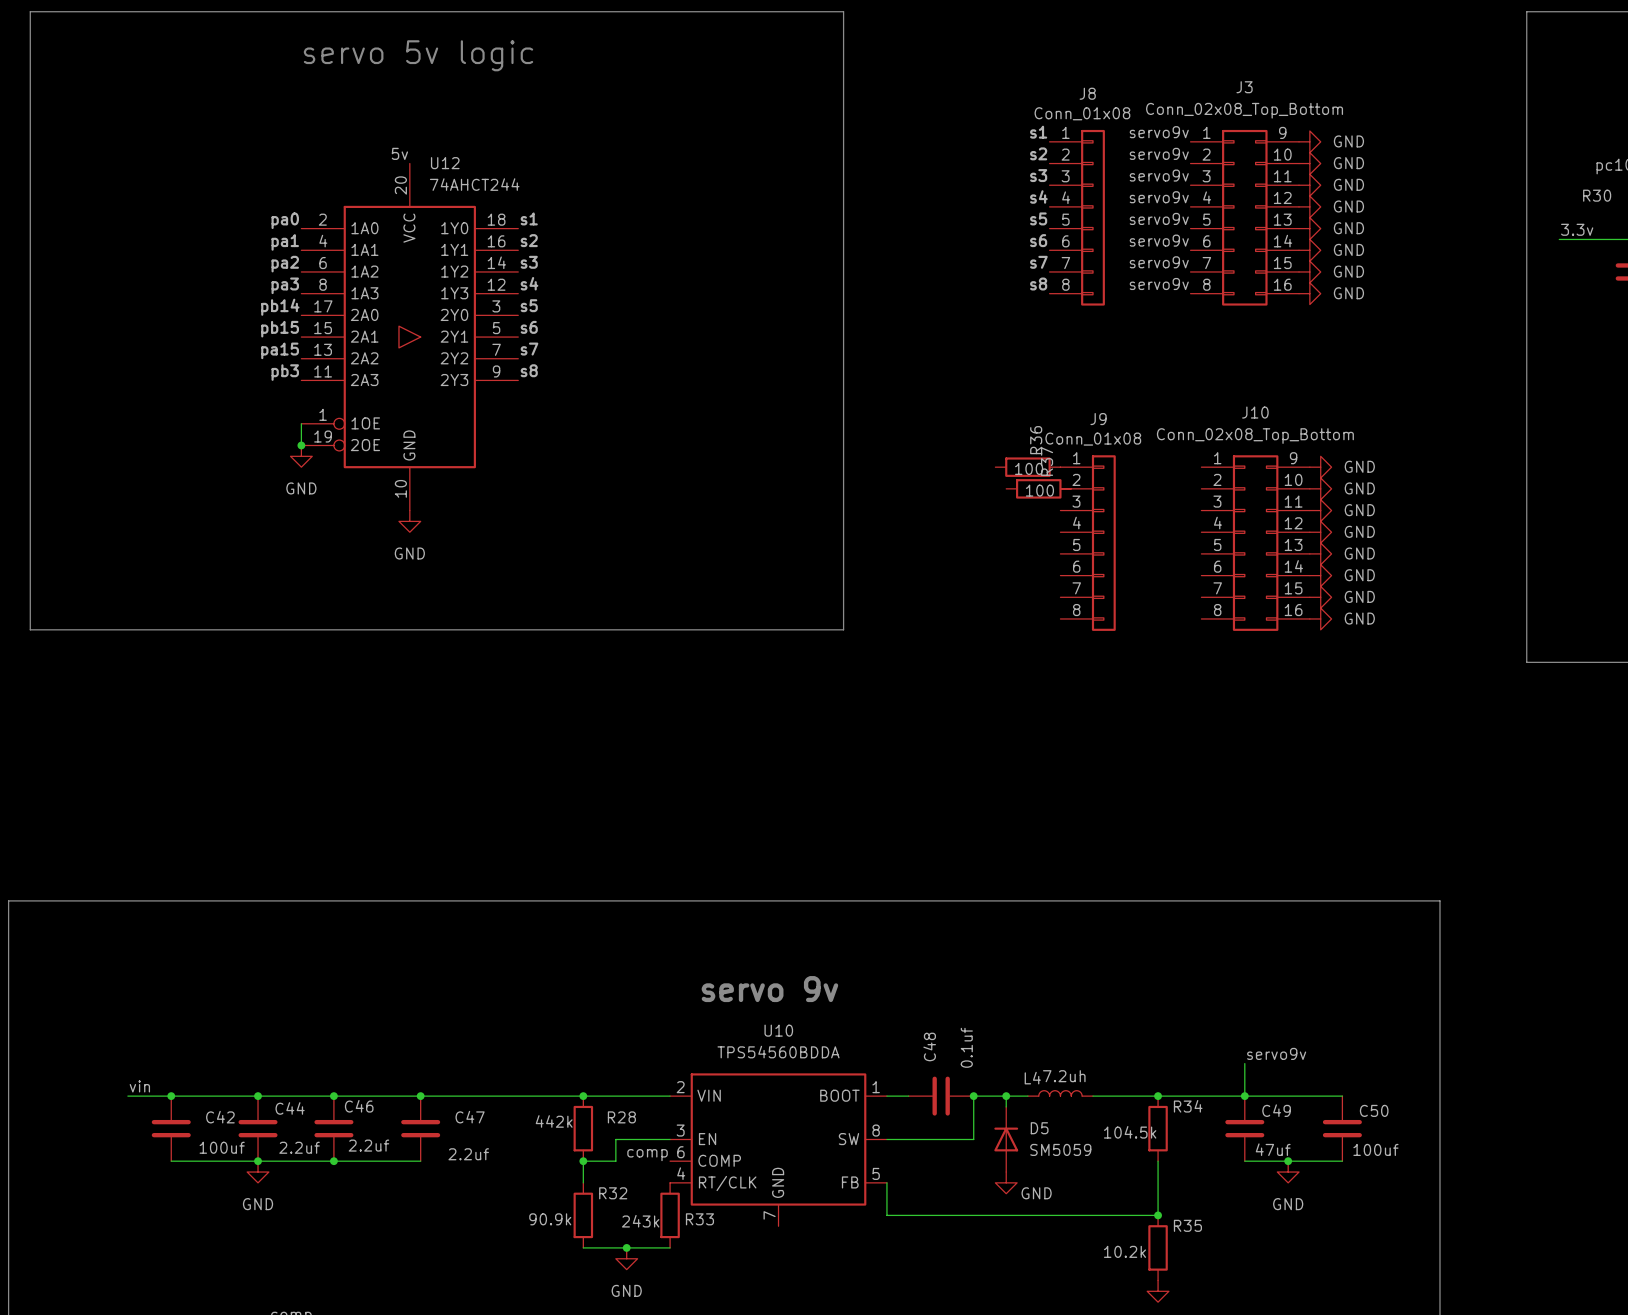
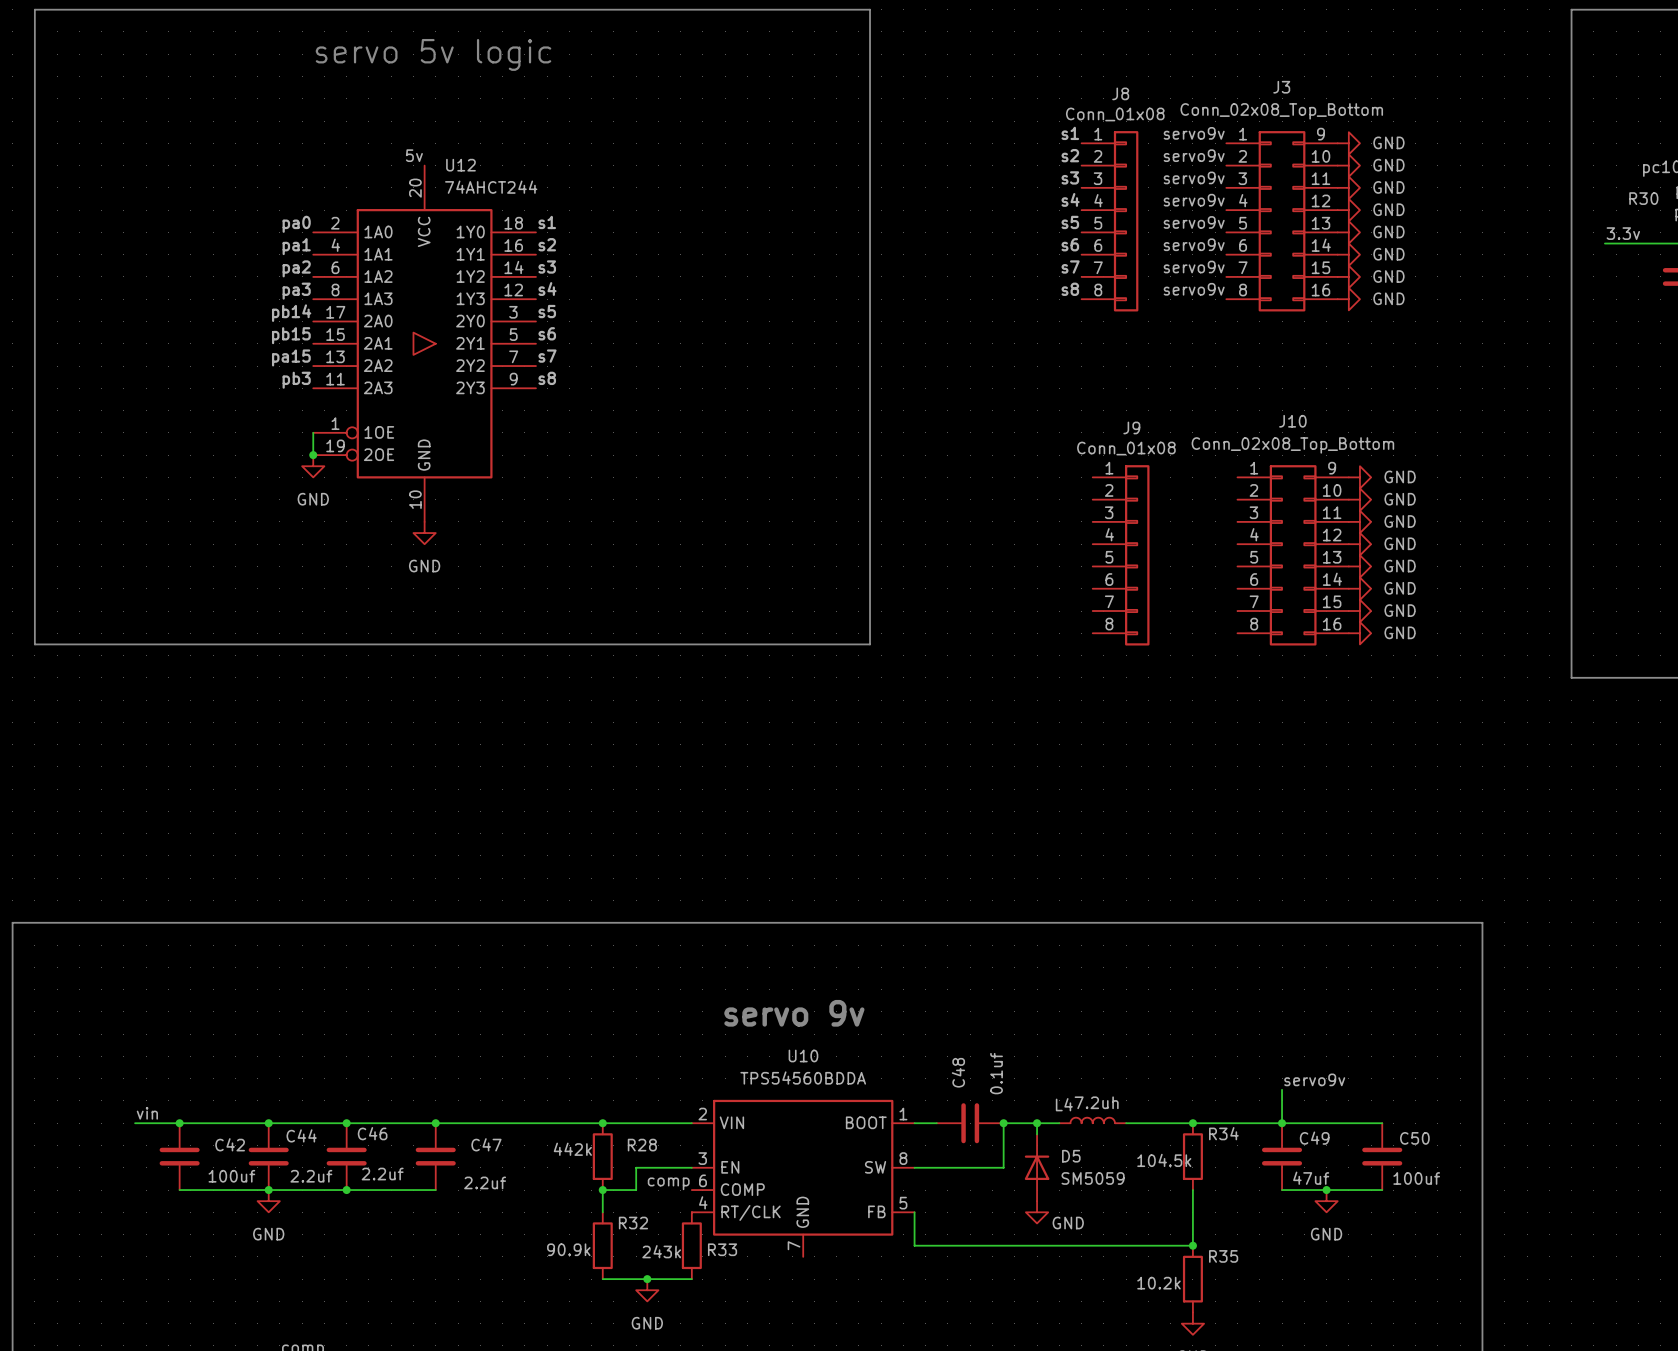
R36: 100 (1027, 467) -> none
R37: 100 (1038, 488) -> none

